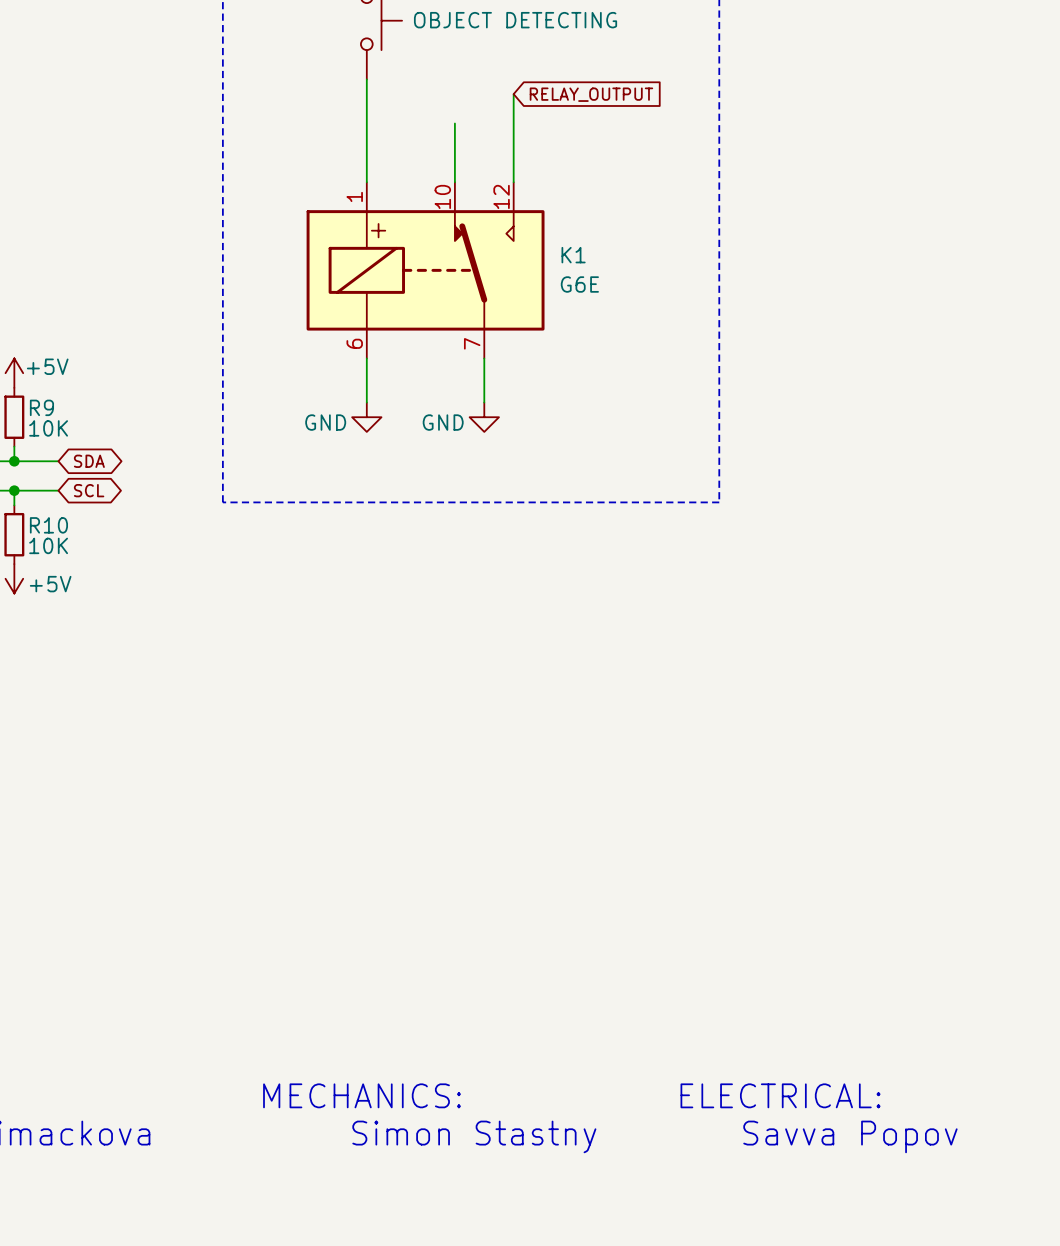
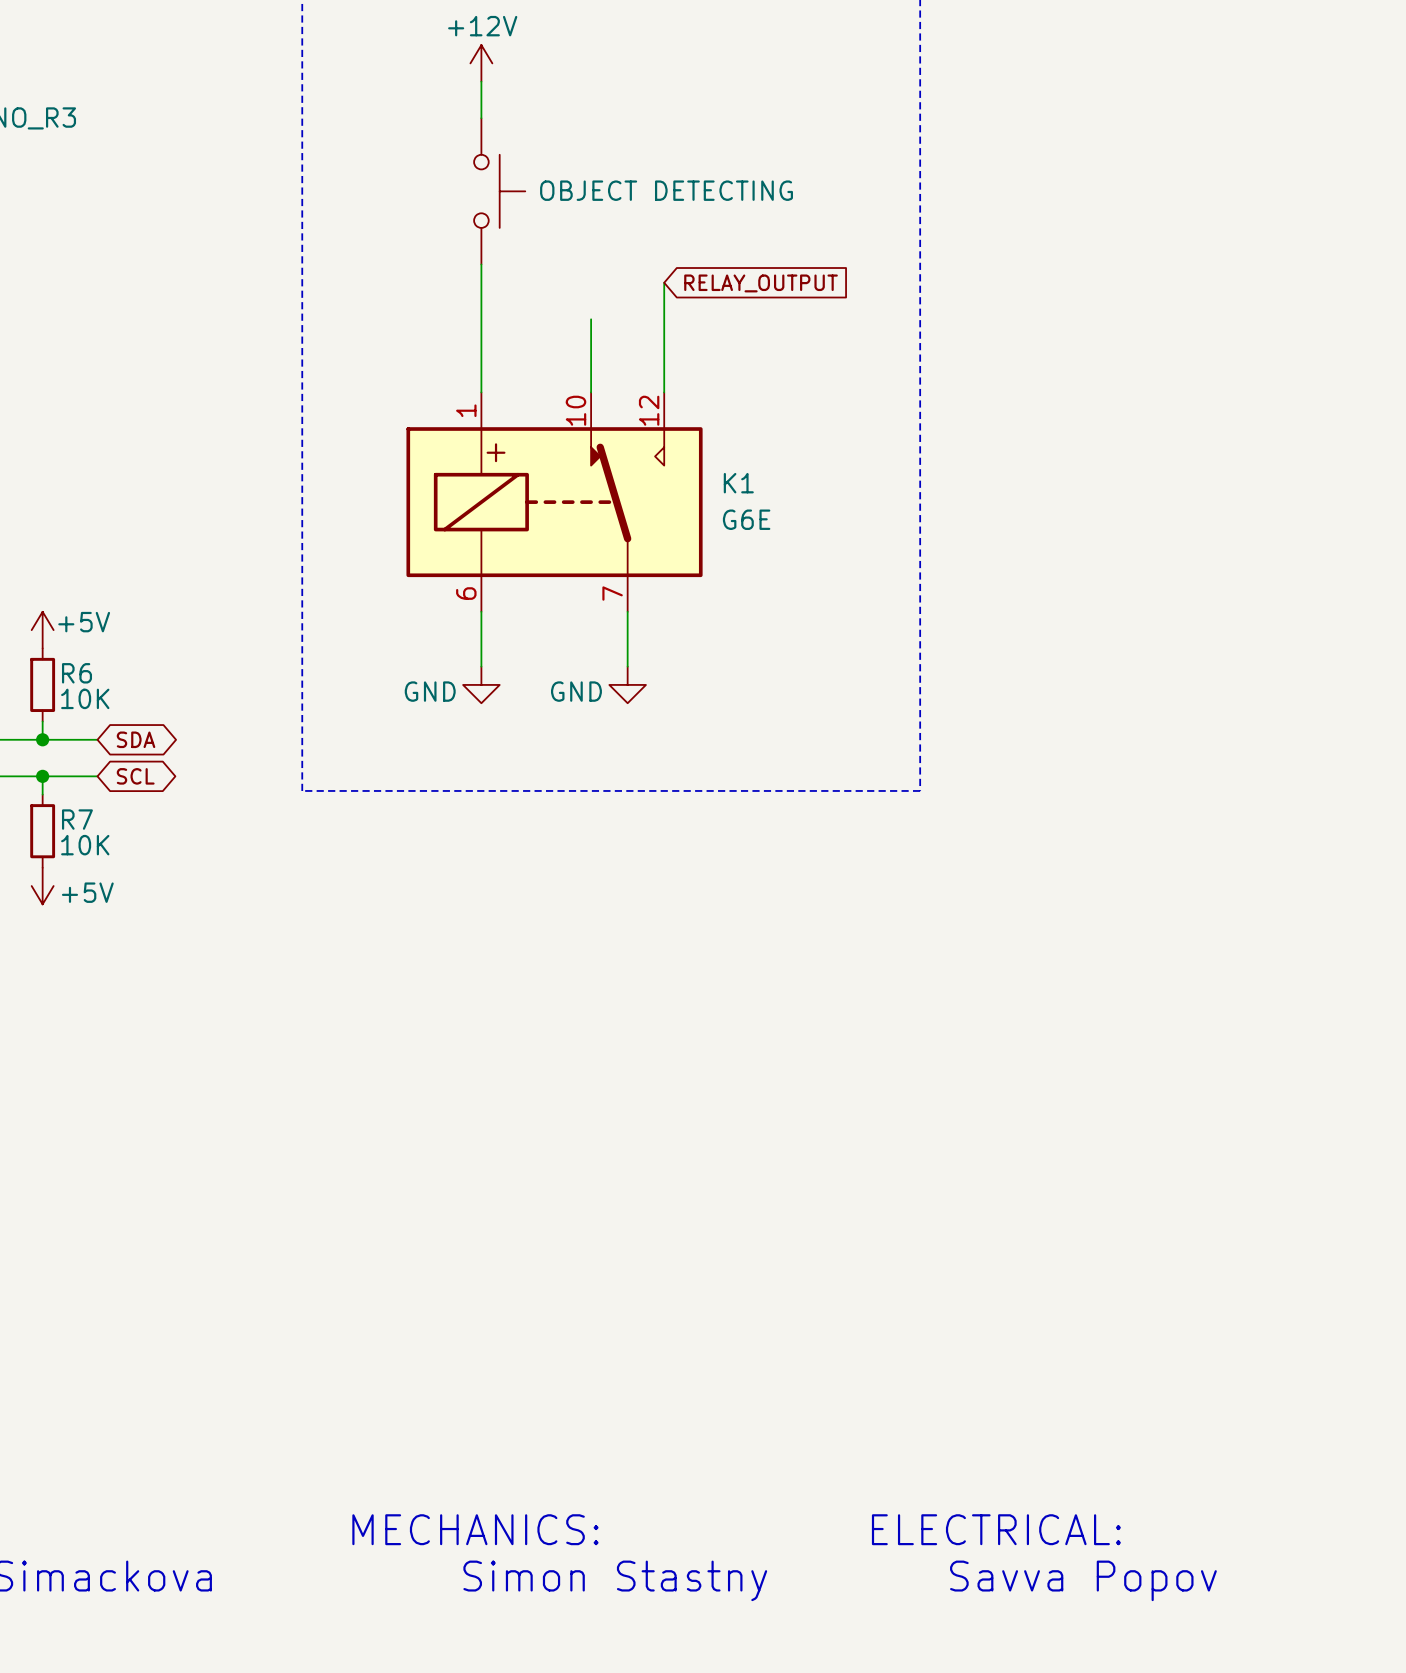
R9 name: R9 (41, 407) -> R6 (77, 673)
R10 name: R10 (48, 525) -> R7 (77, 819)

